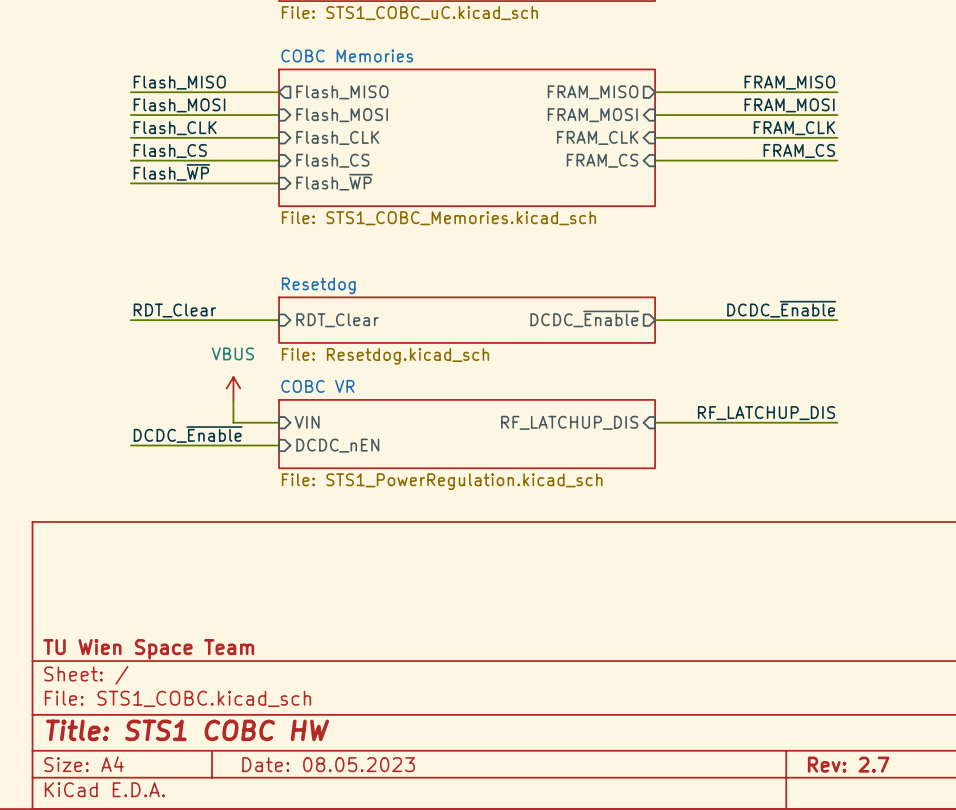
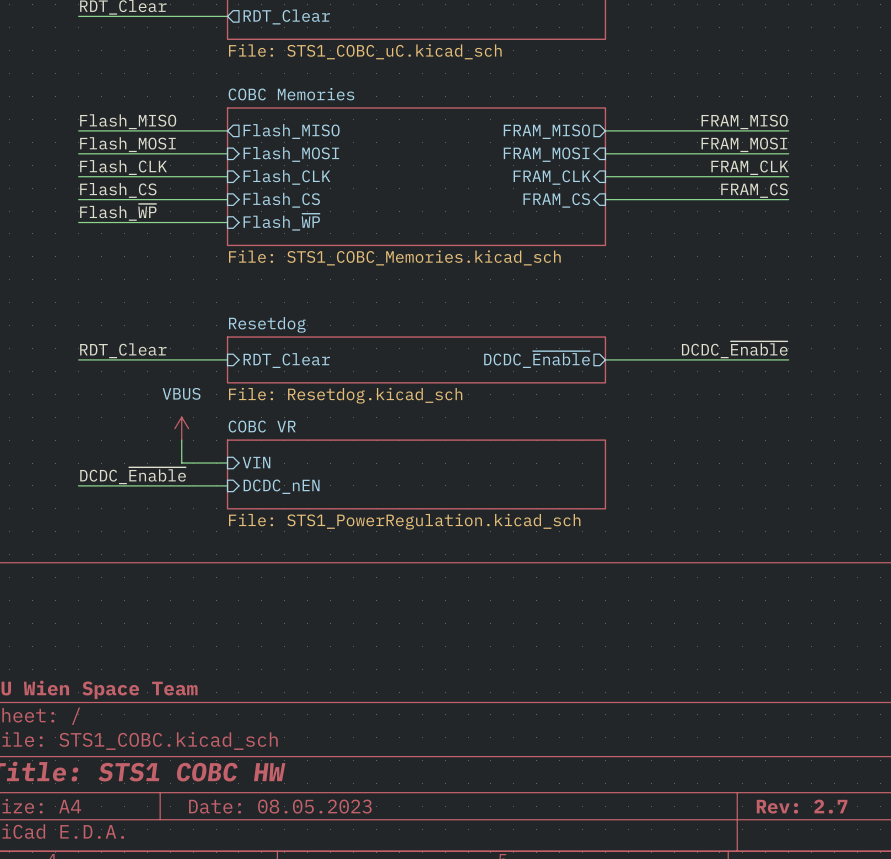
label: RF_LATCHUP_DIS (766, 413) -> none
sheet pin: RF_LATCHUP_DIS (569, 422) -> none
wire: (655, 422) (837, 422) -> none

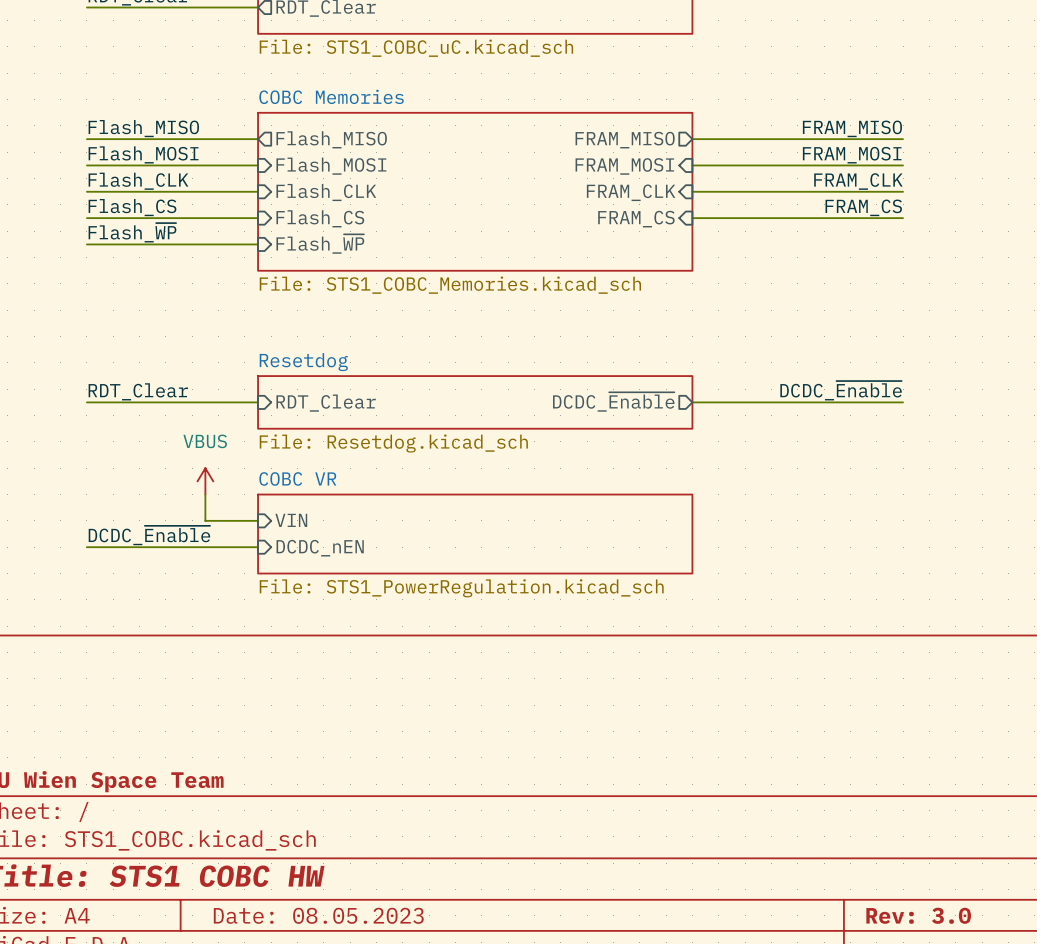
title block: Rev: 2.7 (802, 806) -> Rev: 3.0 (918, 915)

